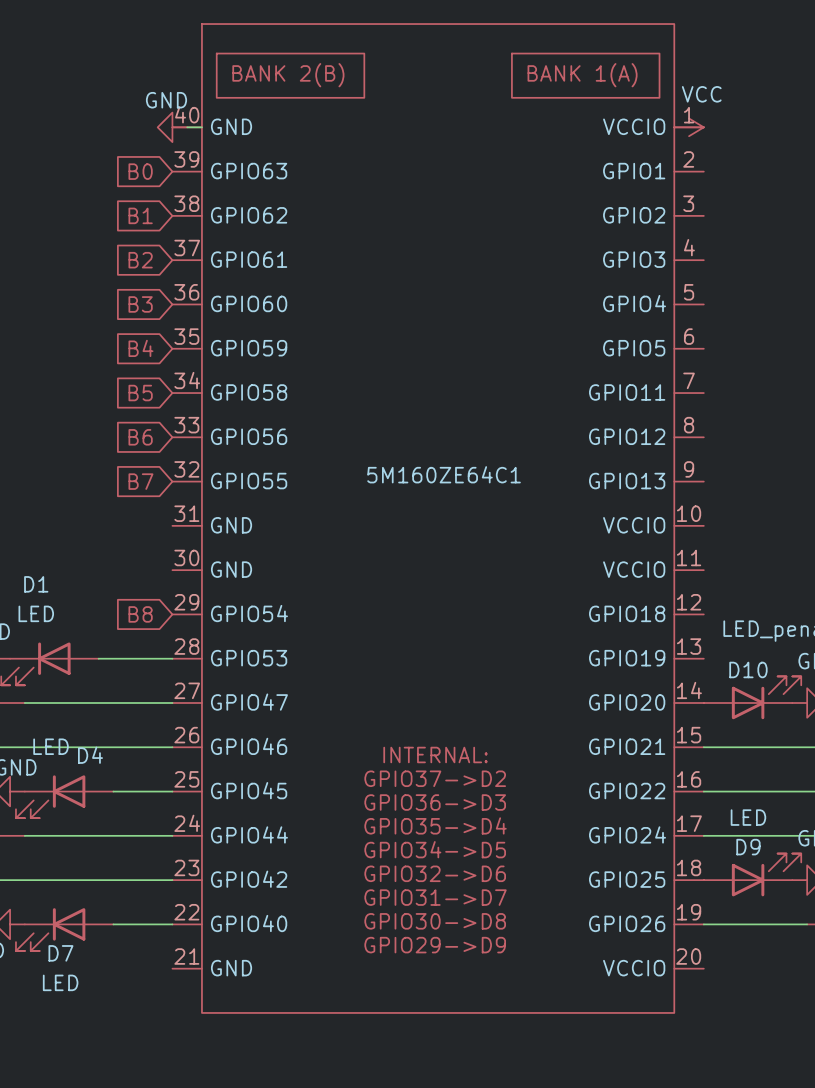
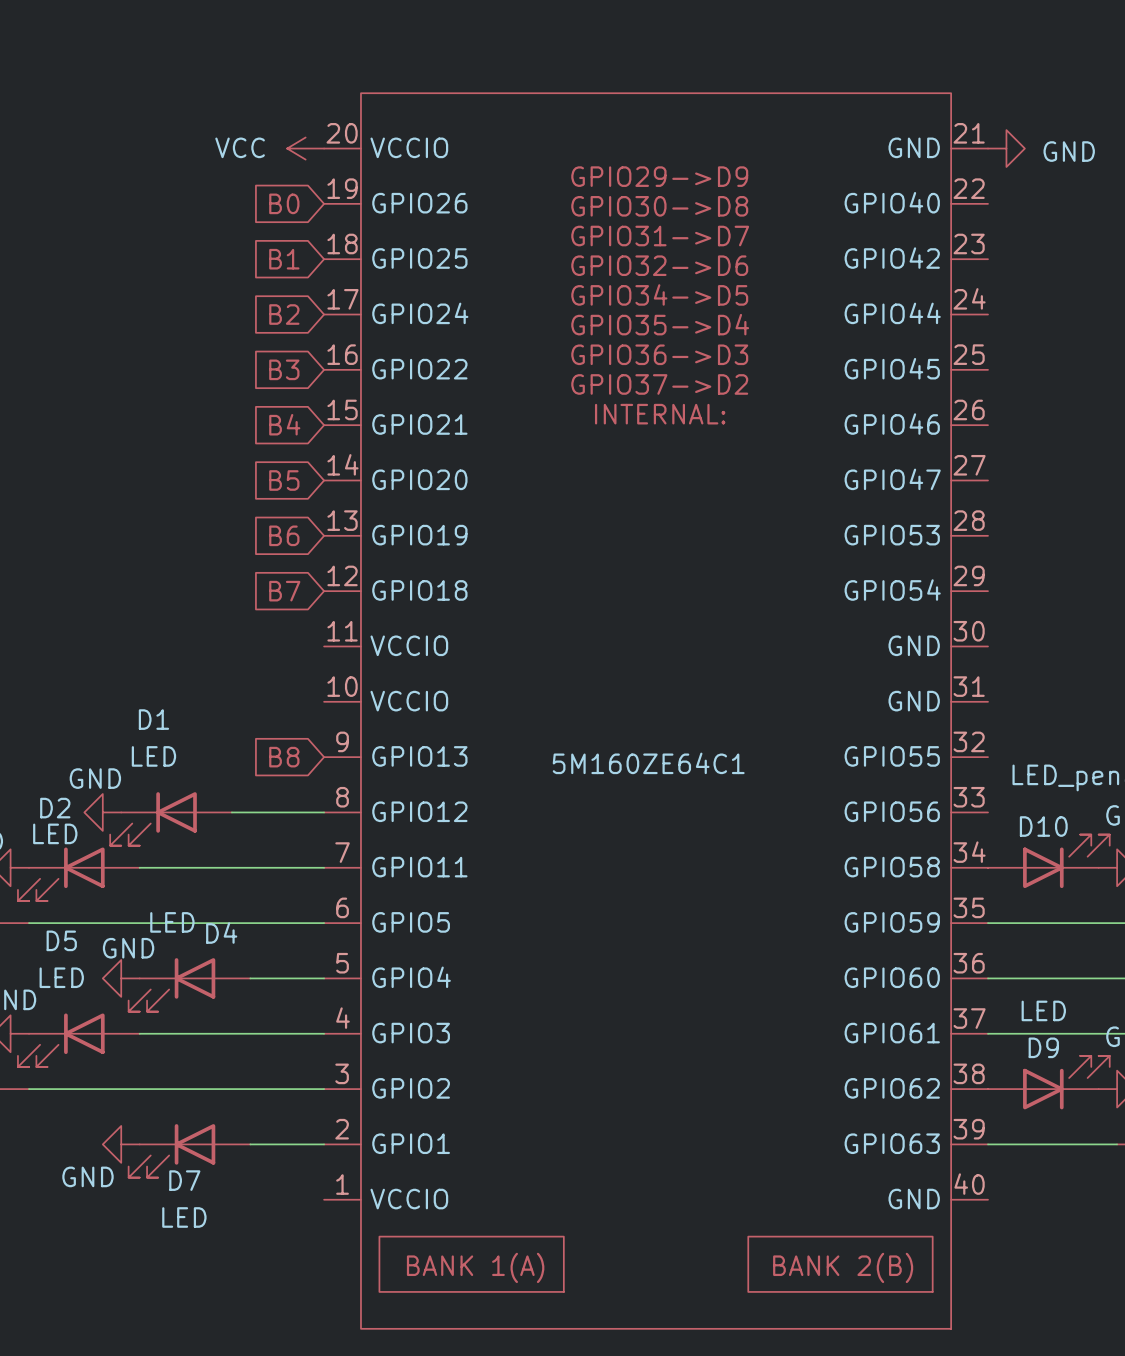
power symbol: none -> VCC (305, 148)
power symbol: GND (172, 127) -> none
power symbol: VCC (689, 127) -> none
power symbol: none -> GND (1006, 148)
5M160ZE64C1 rotation: 0° (438, 518) -> 180° (656, 711)

